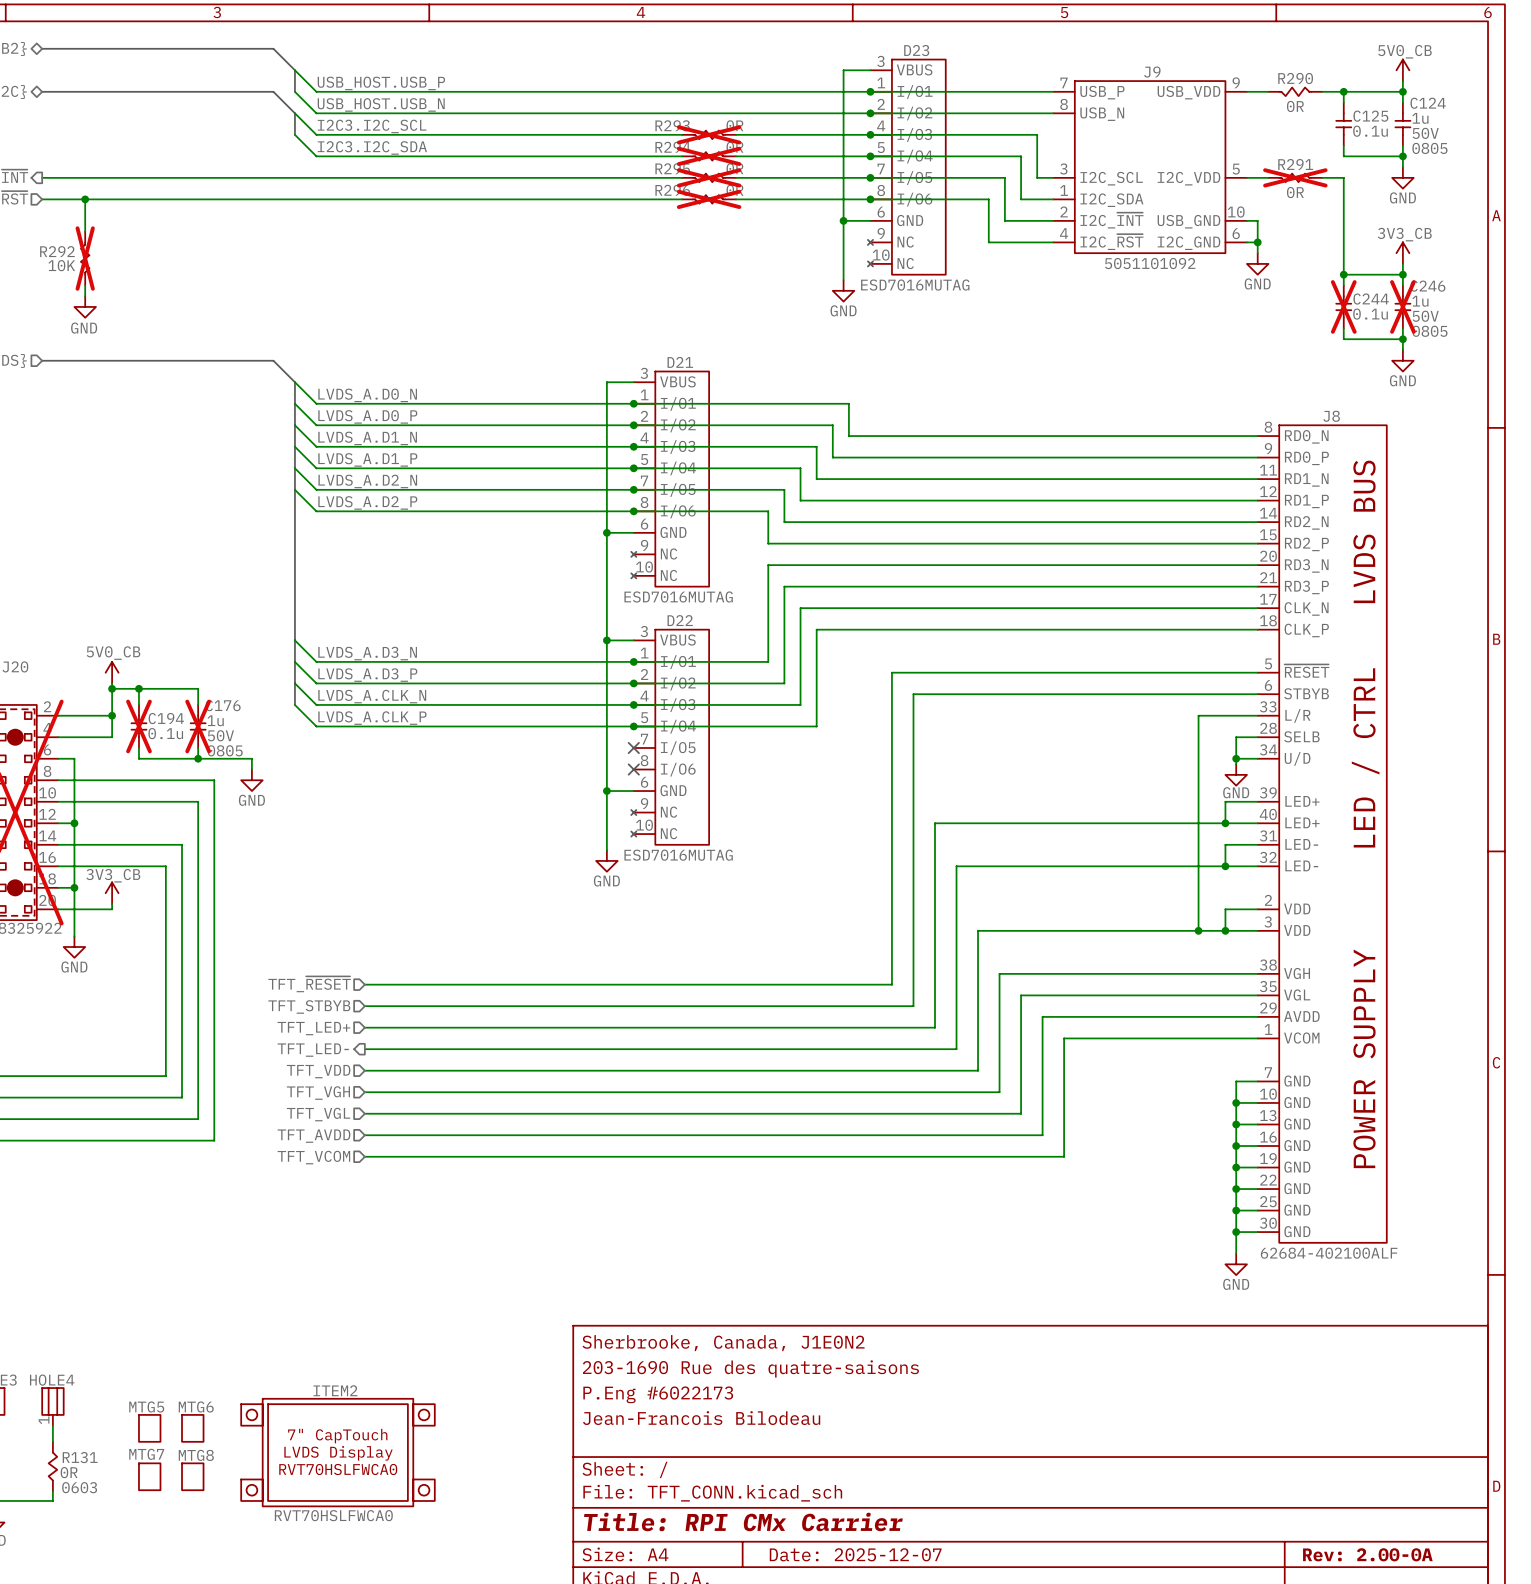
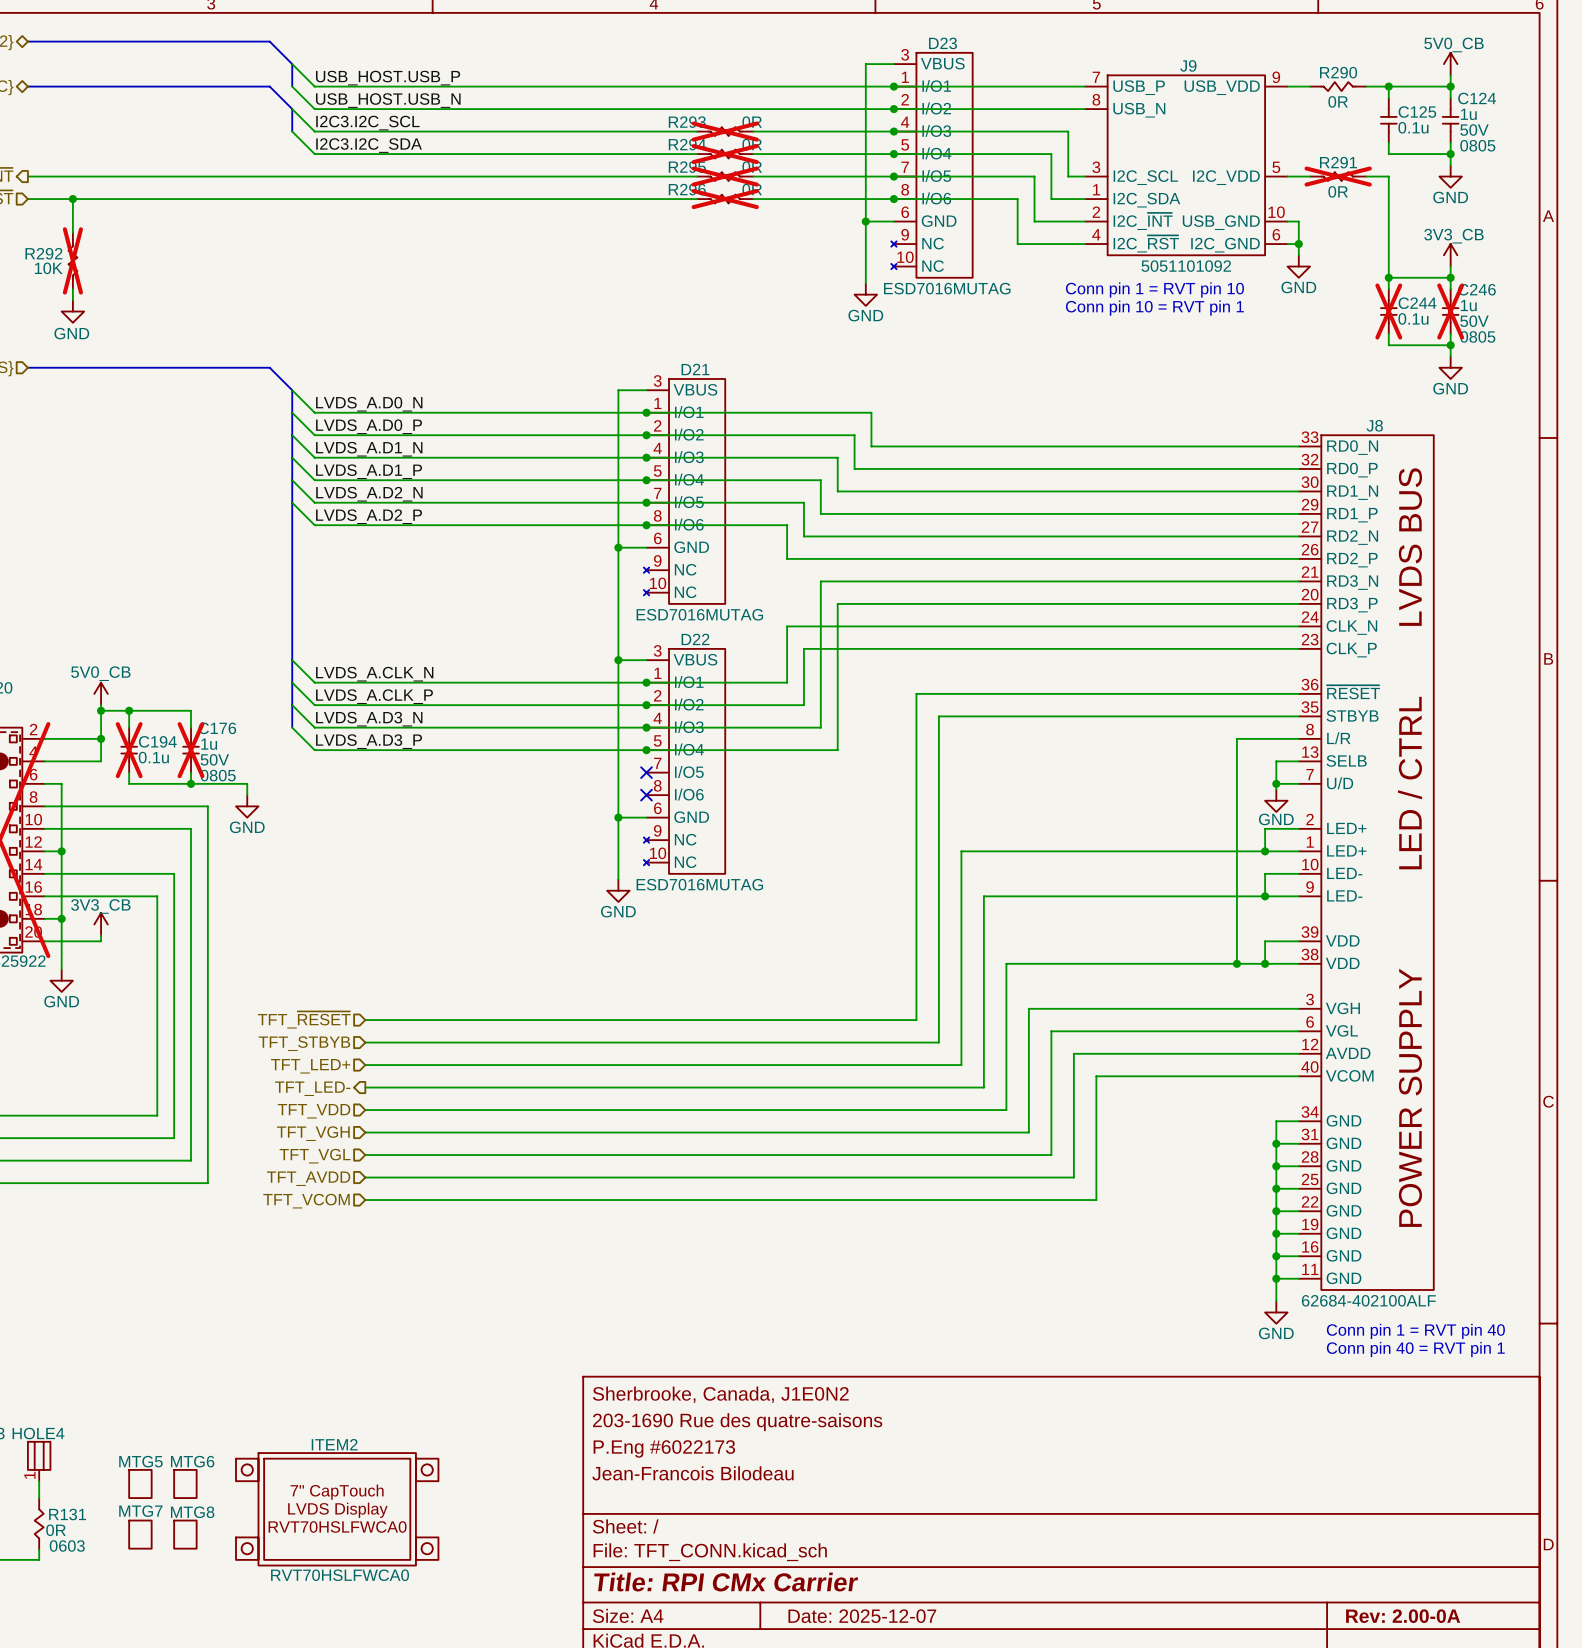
text: none -> Conn pin 1 = RVT pin 10 (1154, 289)
text: none -> Conn pin 10 = RVT pin 1 (1154, 308)
J8 symbol: [1257, 425, 1387, 1243] -> [1298, 435, 1434, 1290]
wire: (800, 565) (768, 565) (768, 608) -> (820, 581) (820, 626) (787, 626)
wire: (816, 586) (784, 586) (784, 629) -> (837, 603) (837, 648) (803, 648)
label: LVDS_A.D3_N (367, 653) -> LVDS_A.CLK_N (374, 674)
label: LVDS_A.D3_P (367, 675) -> LVDS_A.CLK_P (374, 696)
label: LVDS_A.CLK_N (372, 696) -> LVDS_A.D3_N (369, 719)
label: LVDS_A.CLK_P (372, 718) -> LVDS_A.D3_P (369, 741)
text: none -> Conn pin 1 = RVT pin 40 (1415, 1331)
text: none -> Conn pin 40 = RVT pin 1 (1415, 1349)

